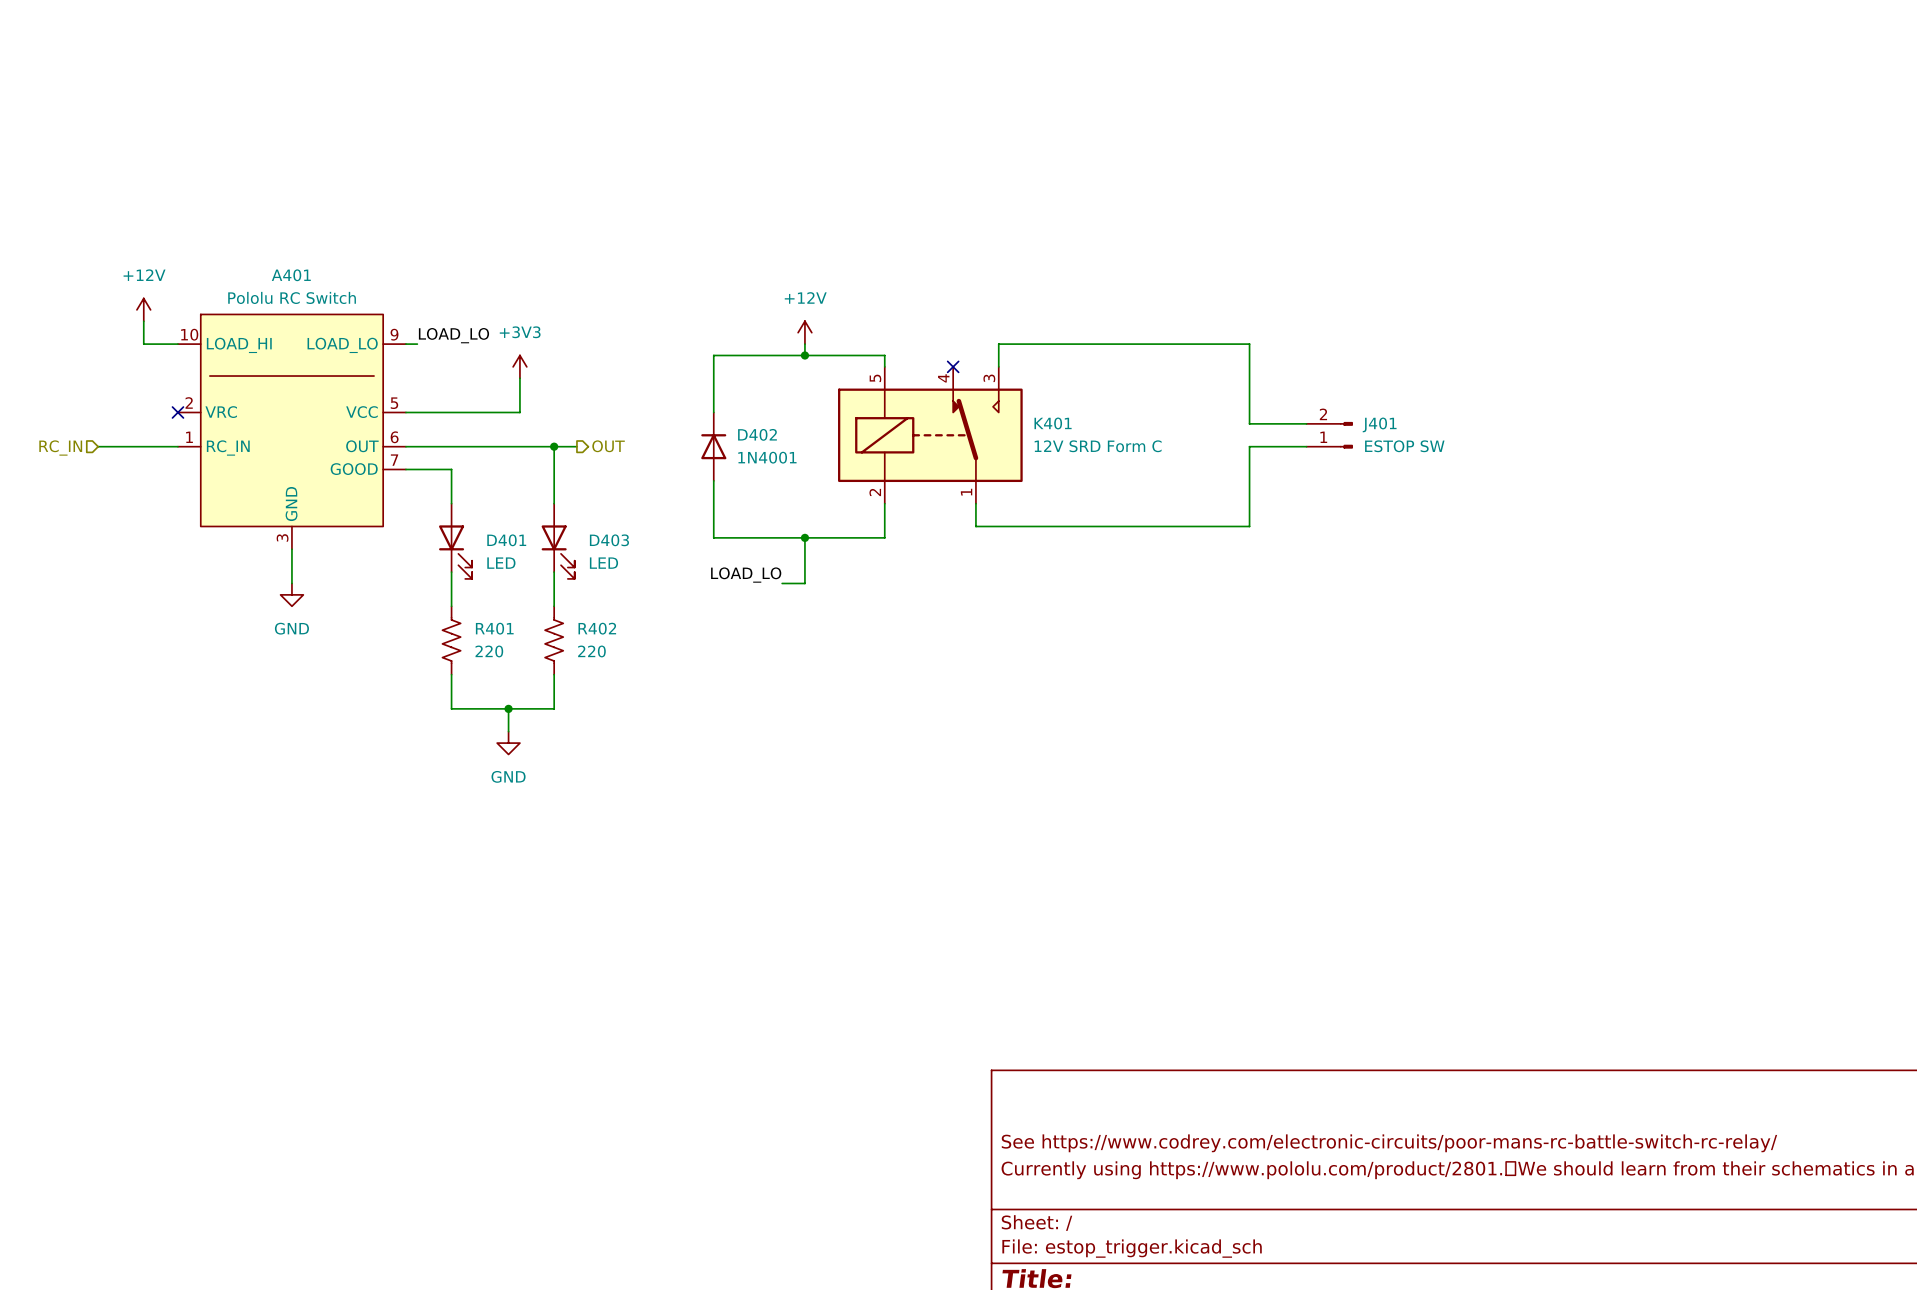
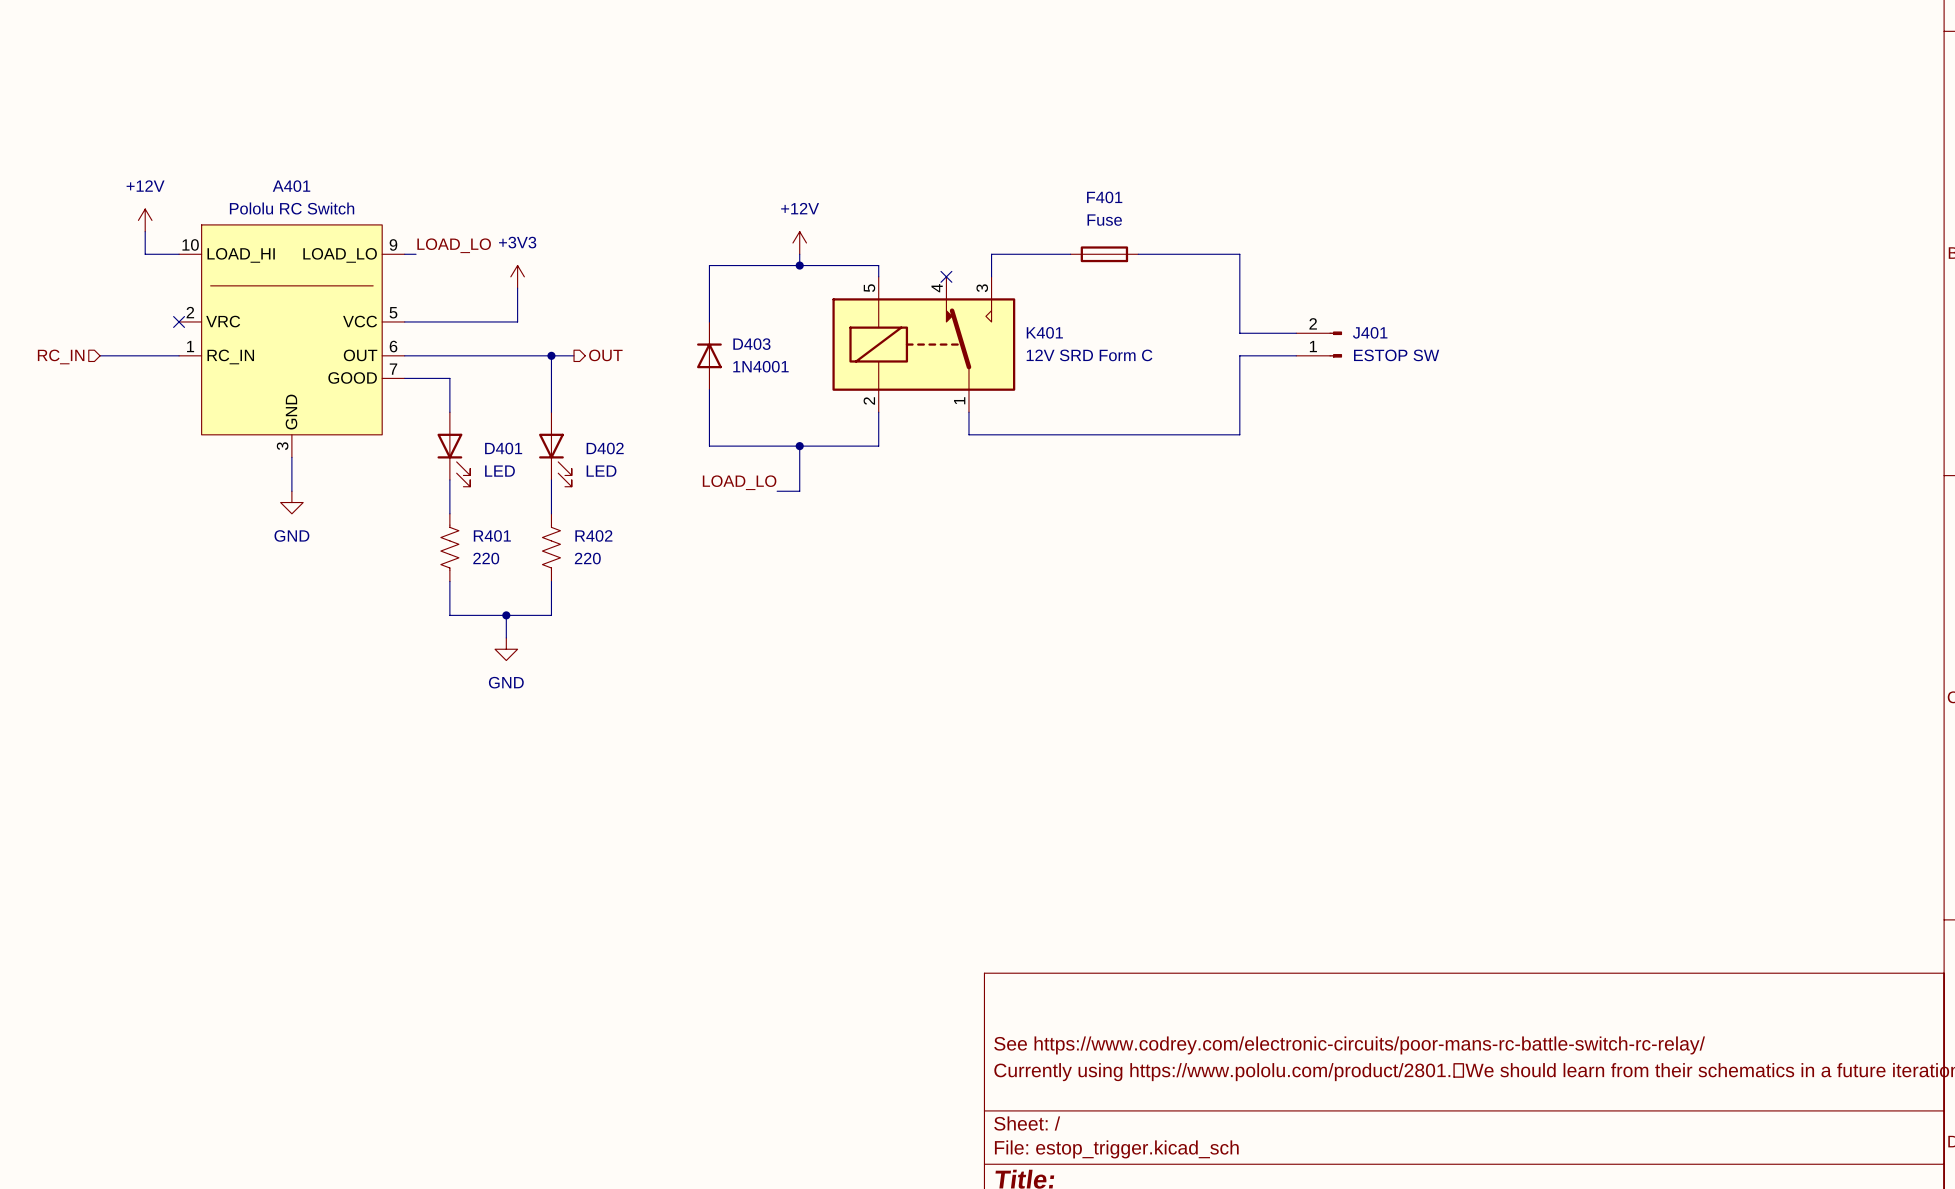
F401: none -> Fuse (1104, 254)
D402 name: D402 (757, 434) -> D403 (751, 344)
D403 name: D403 (609, 540) -> D402 (605, 448)

